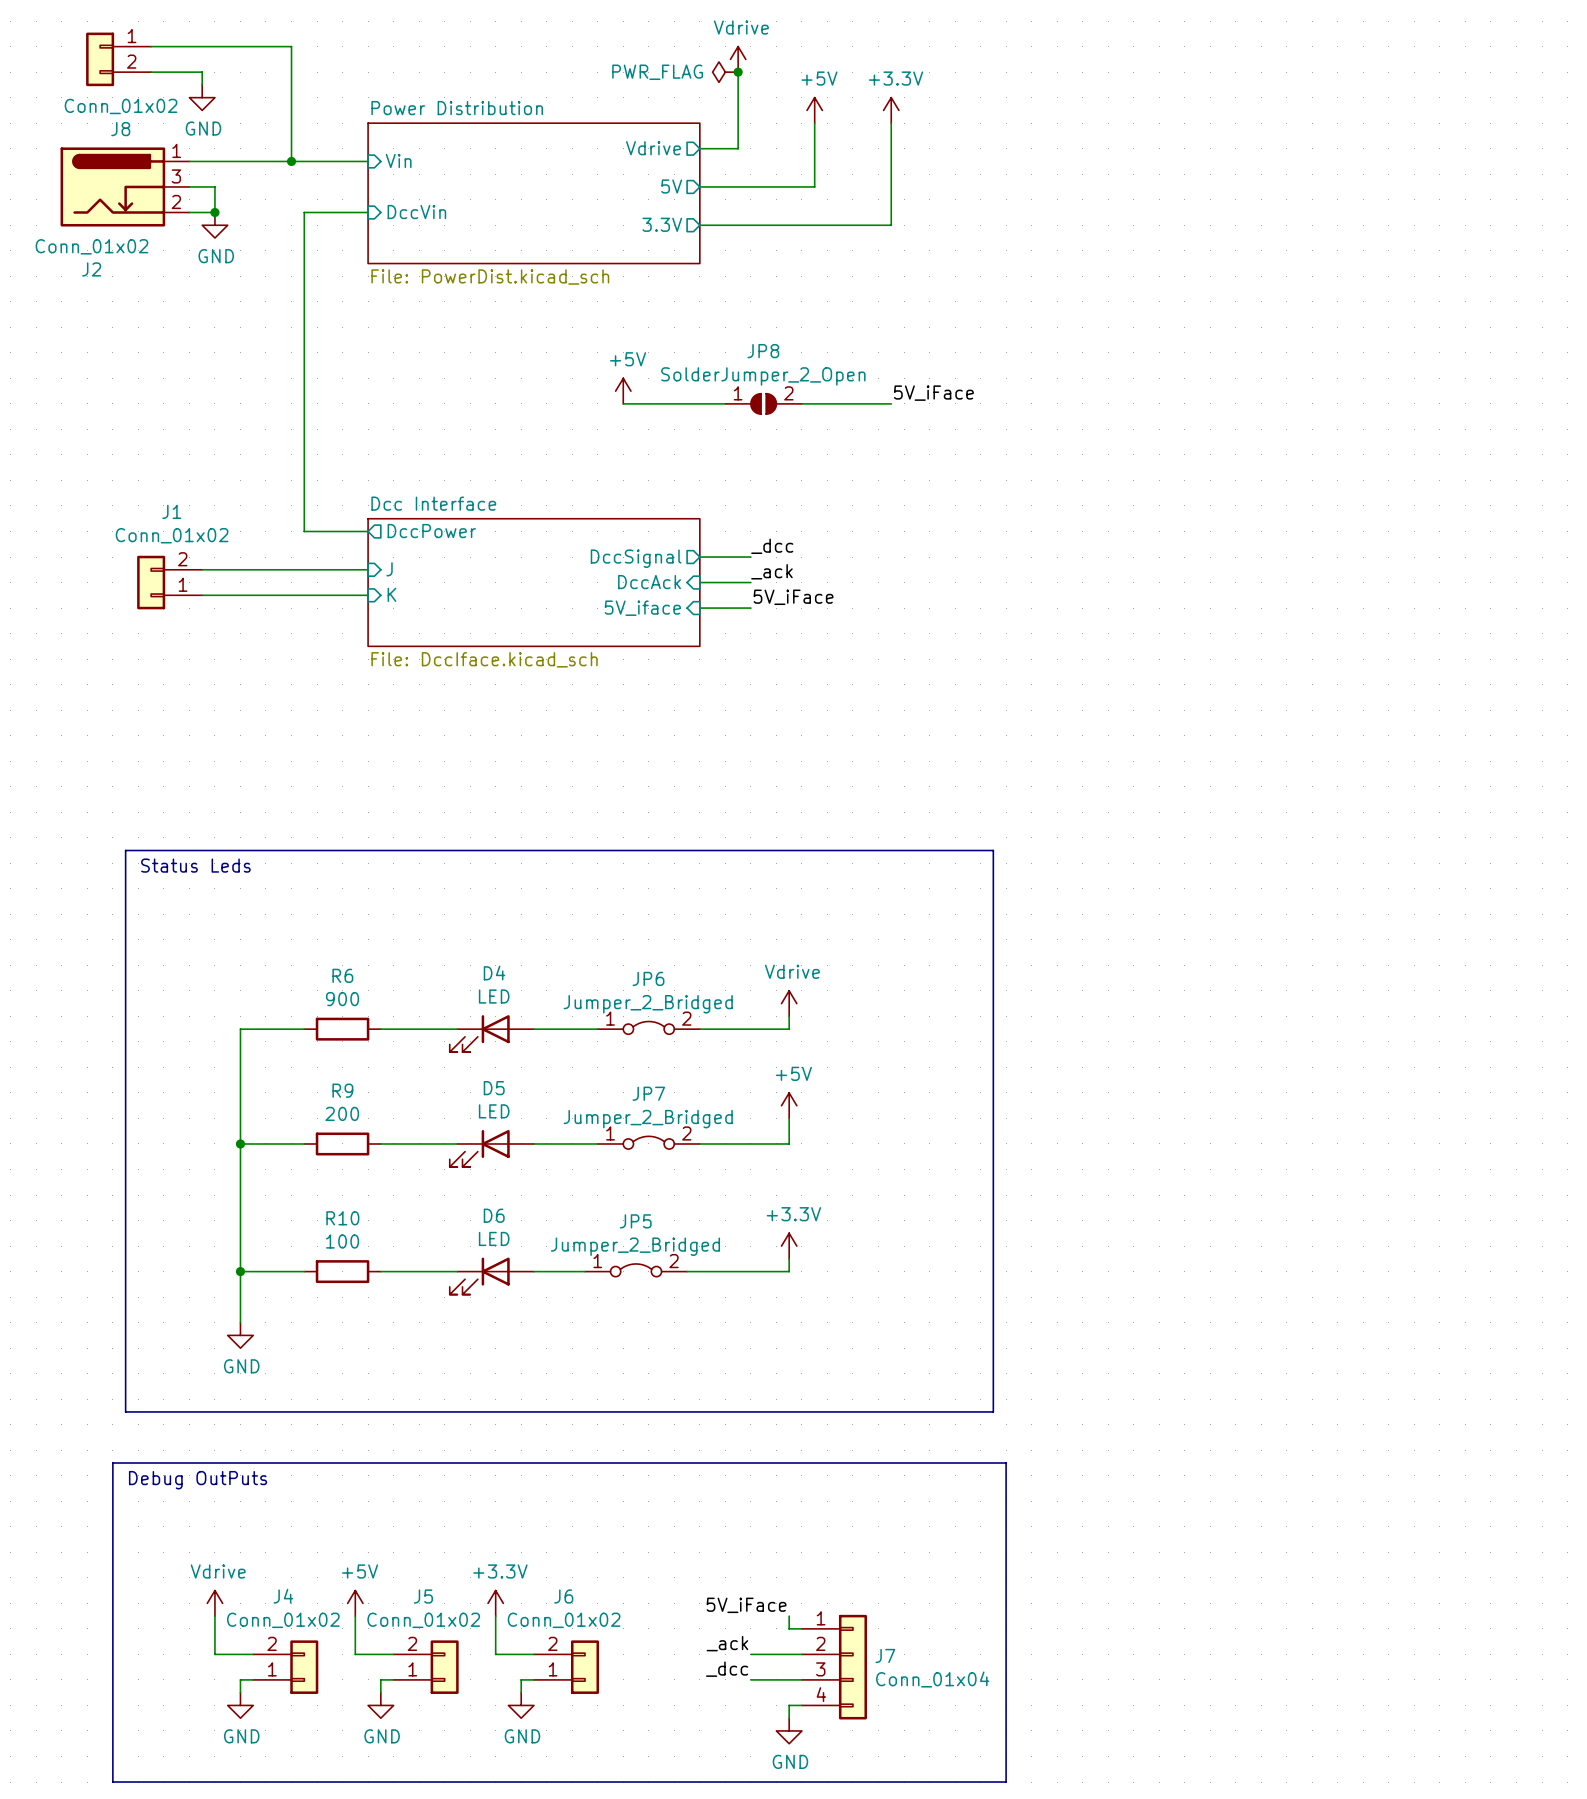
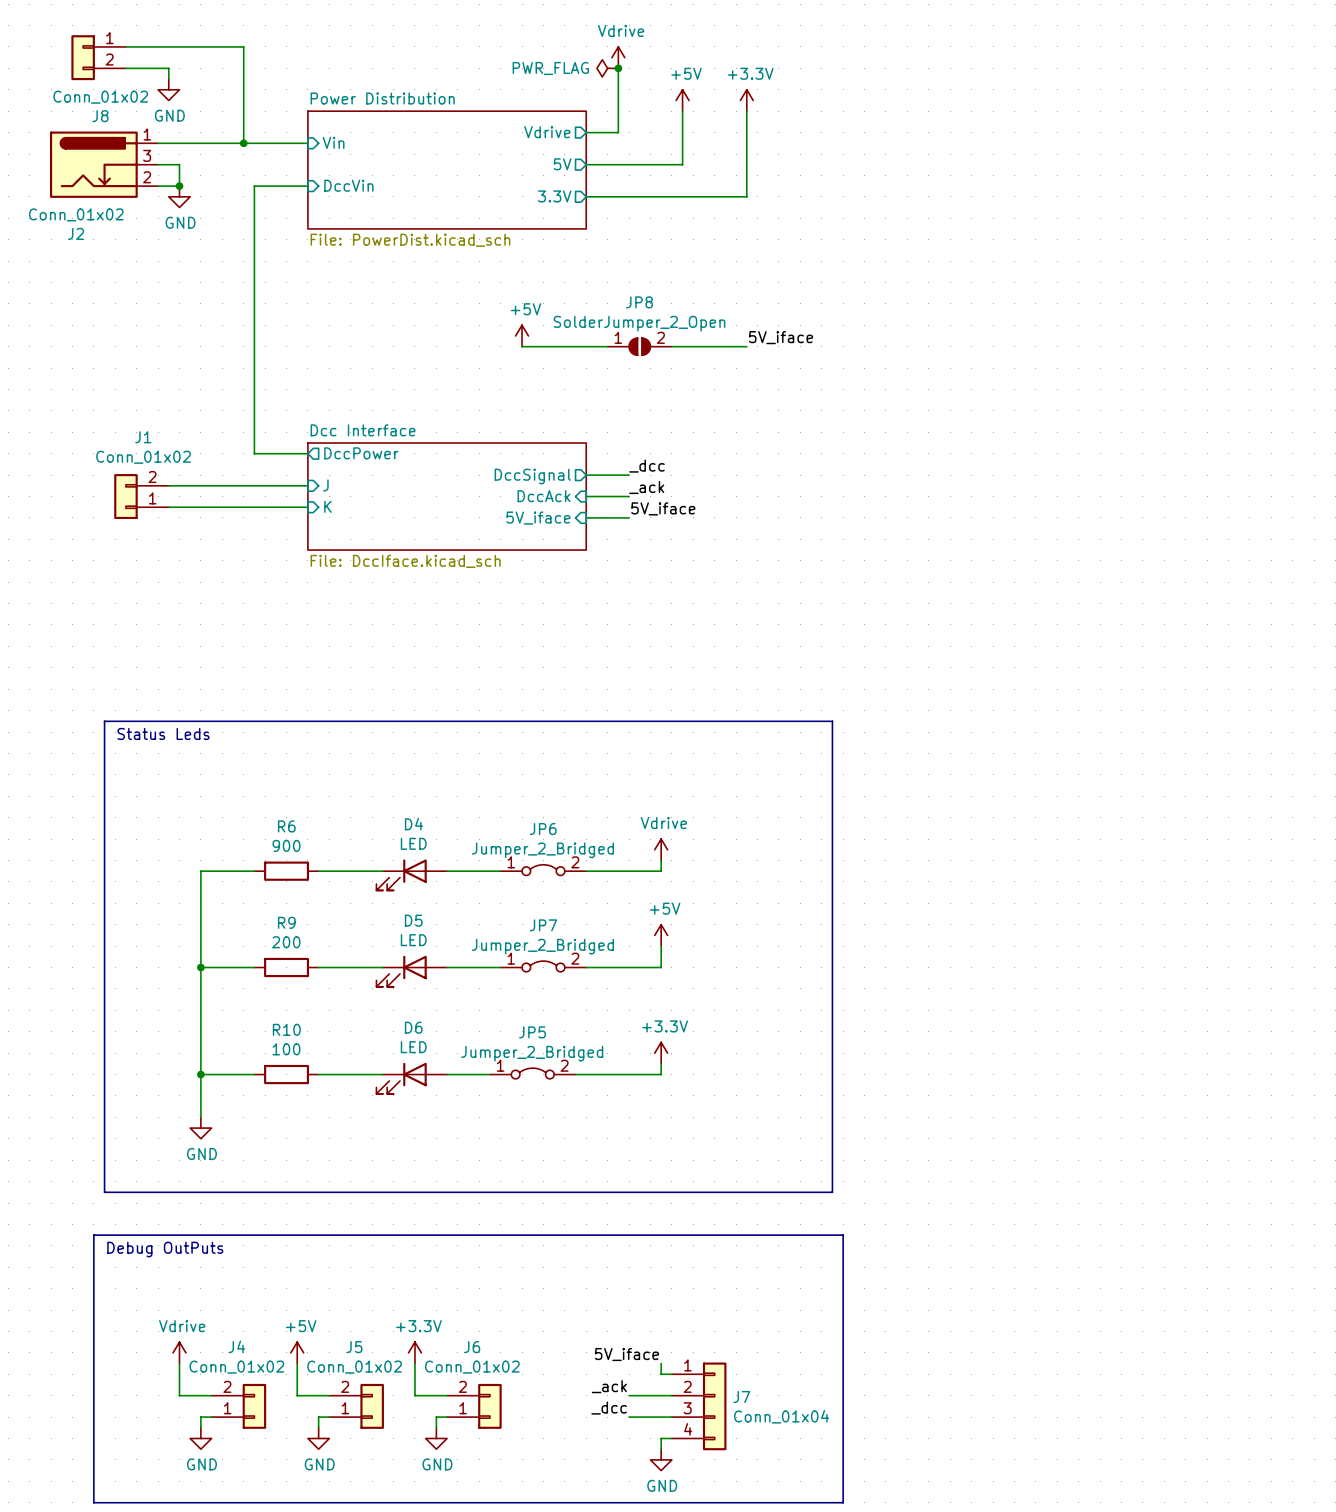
label: 5V_iFace (933, 393) -> 5V_iface (781, 337)
label: 5V_iFace (793, 597) -> 5V_iface (663, 508)
label: 5V_iFace (746, 1605) -> 5V_iface (626, 1354)

